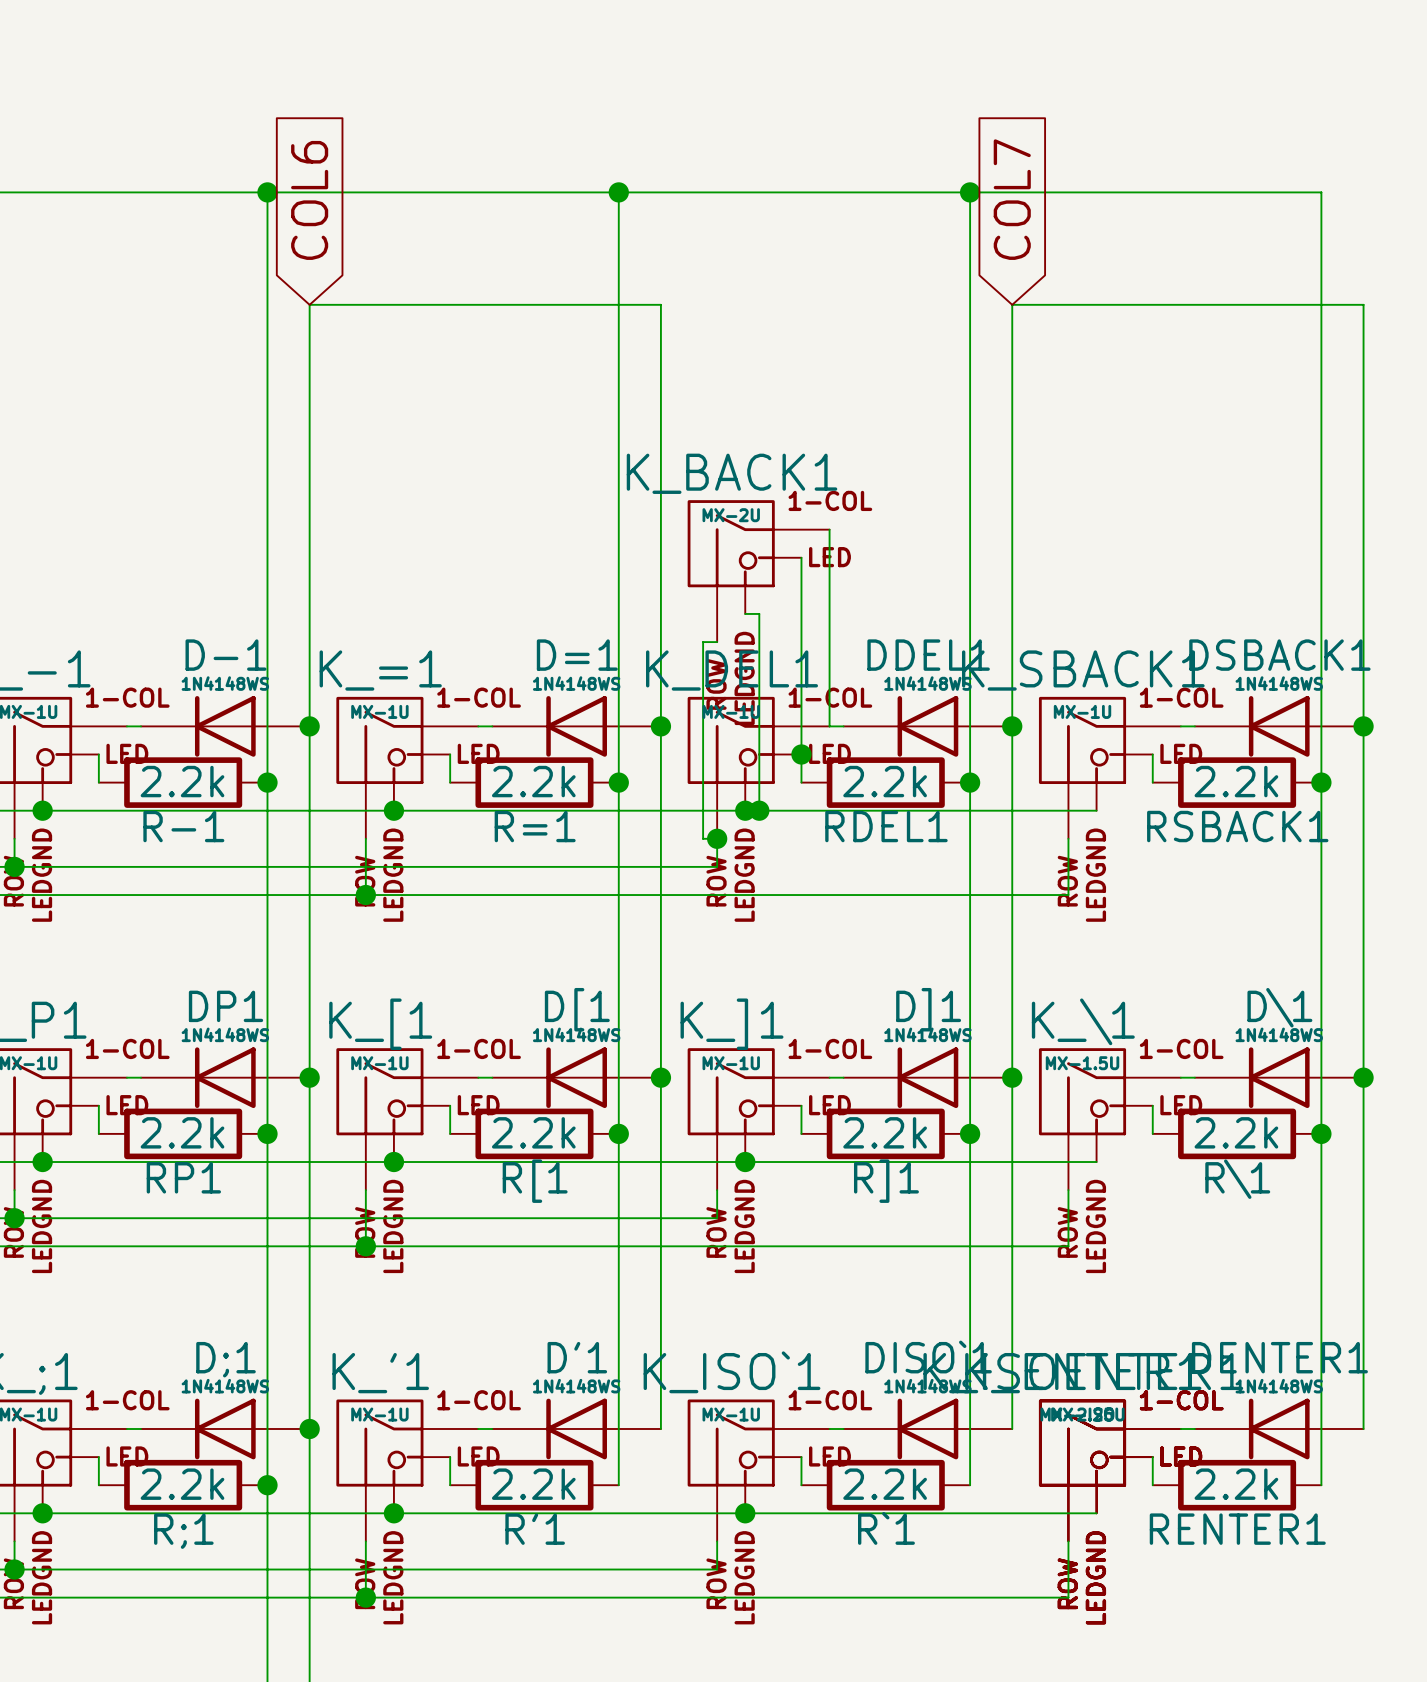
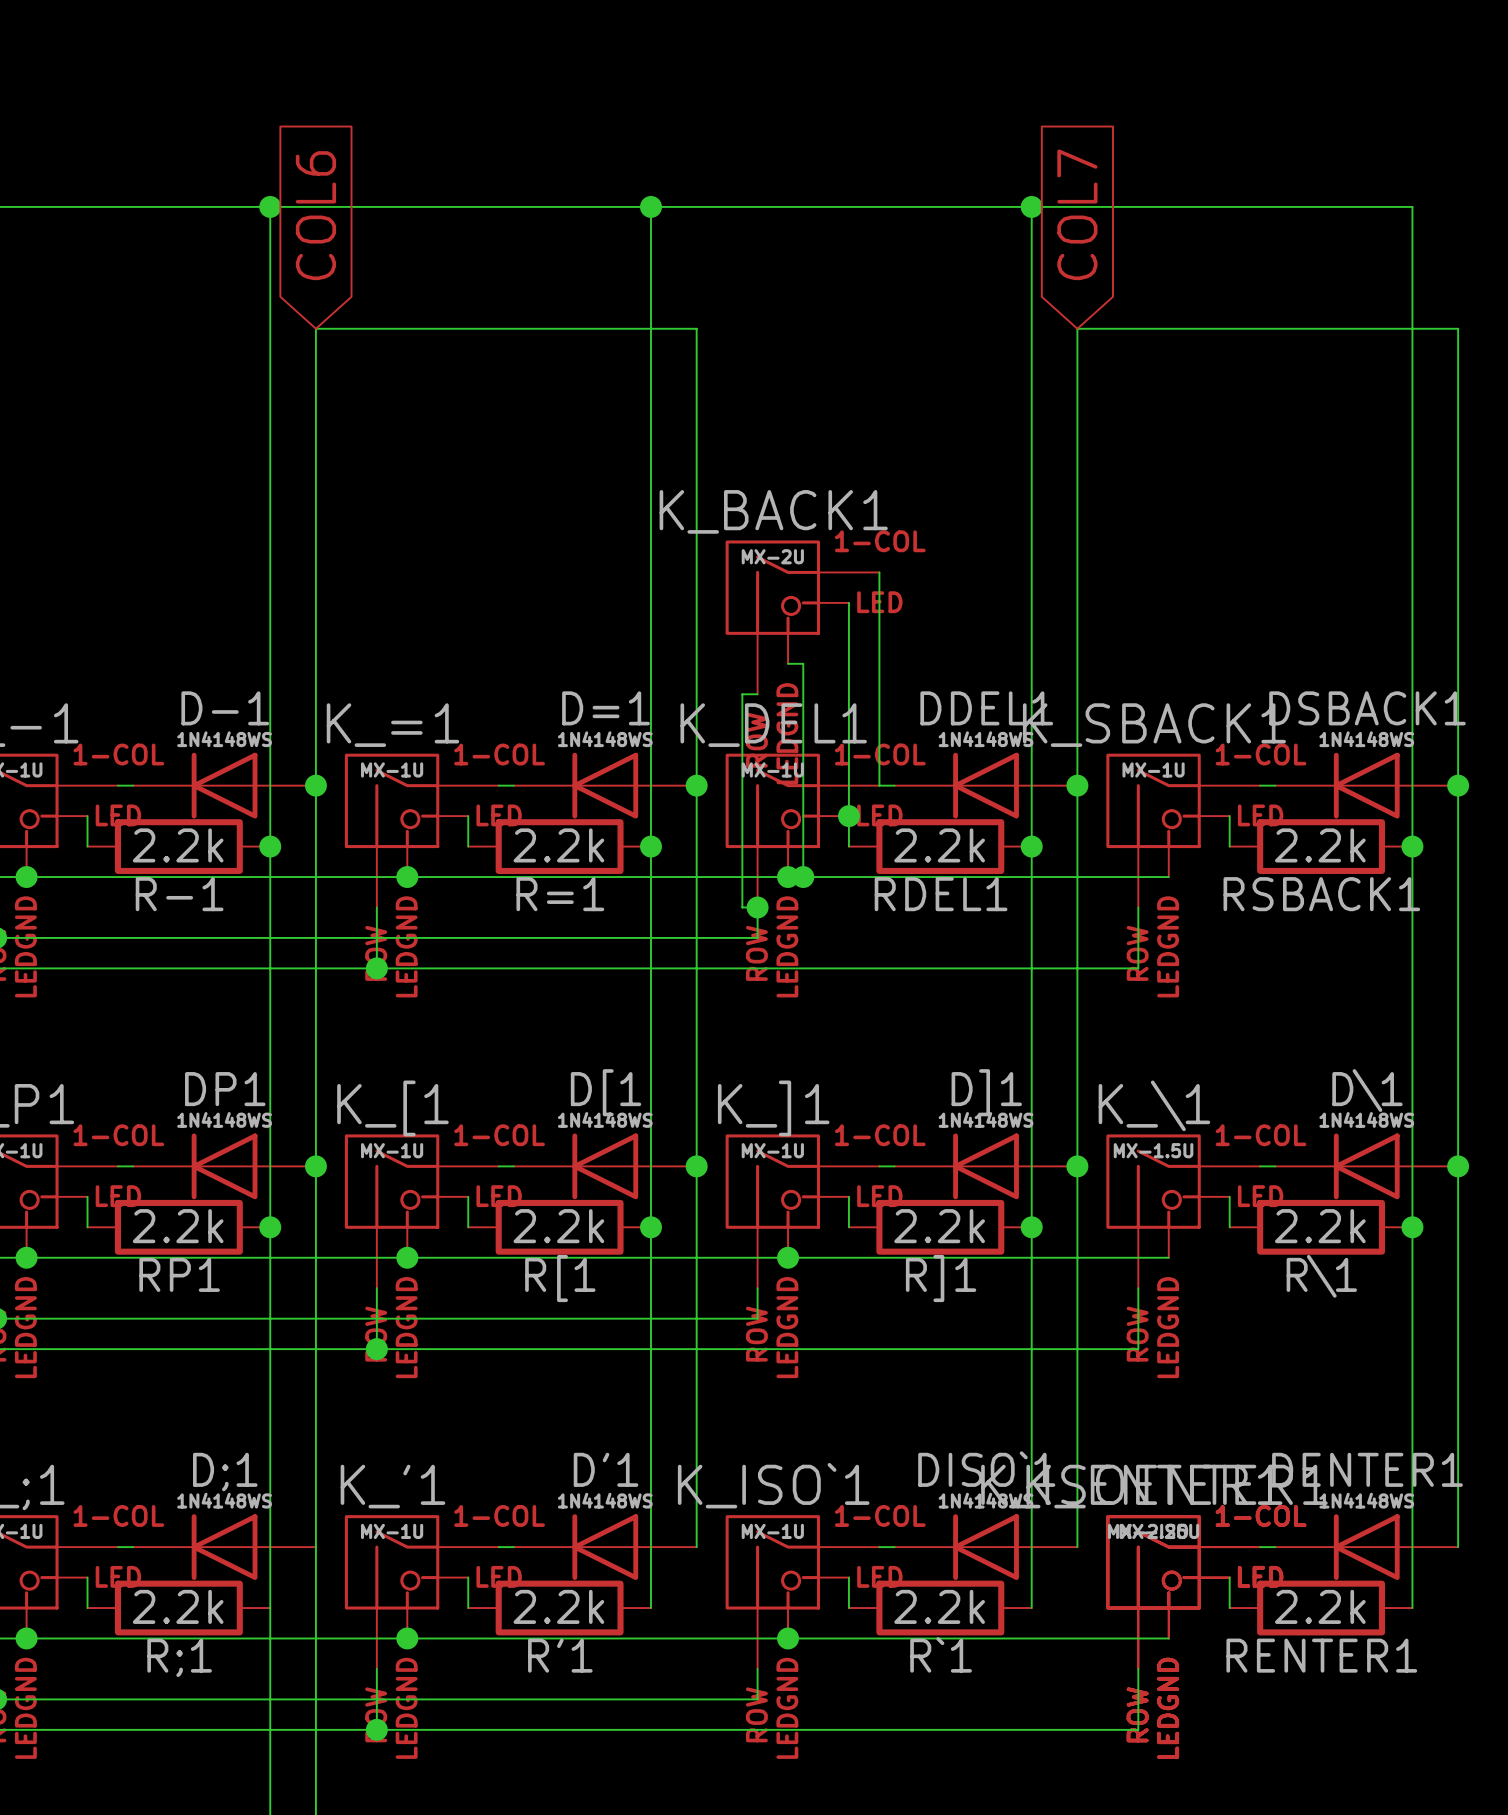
junction: (309, 1428) -> none
junction: (267, 1485) -> none

